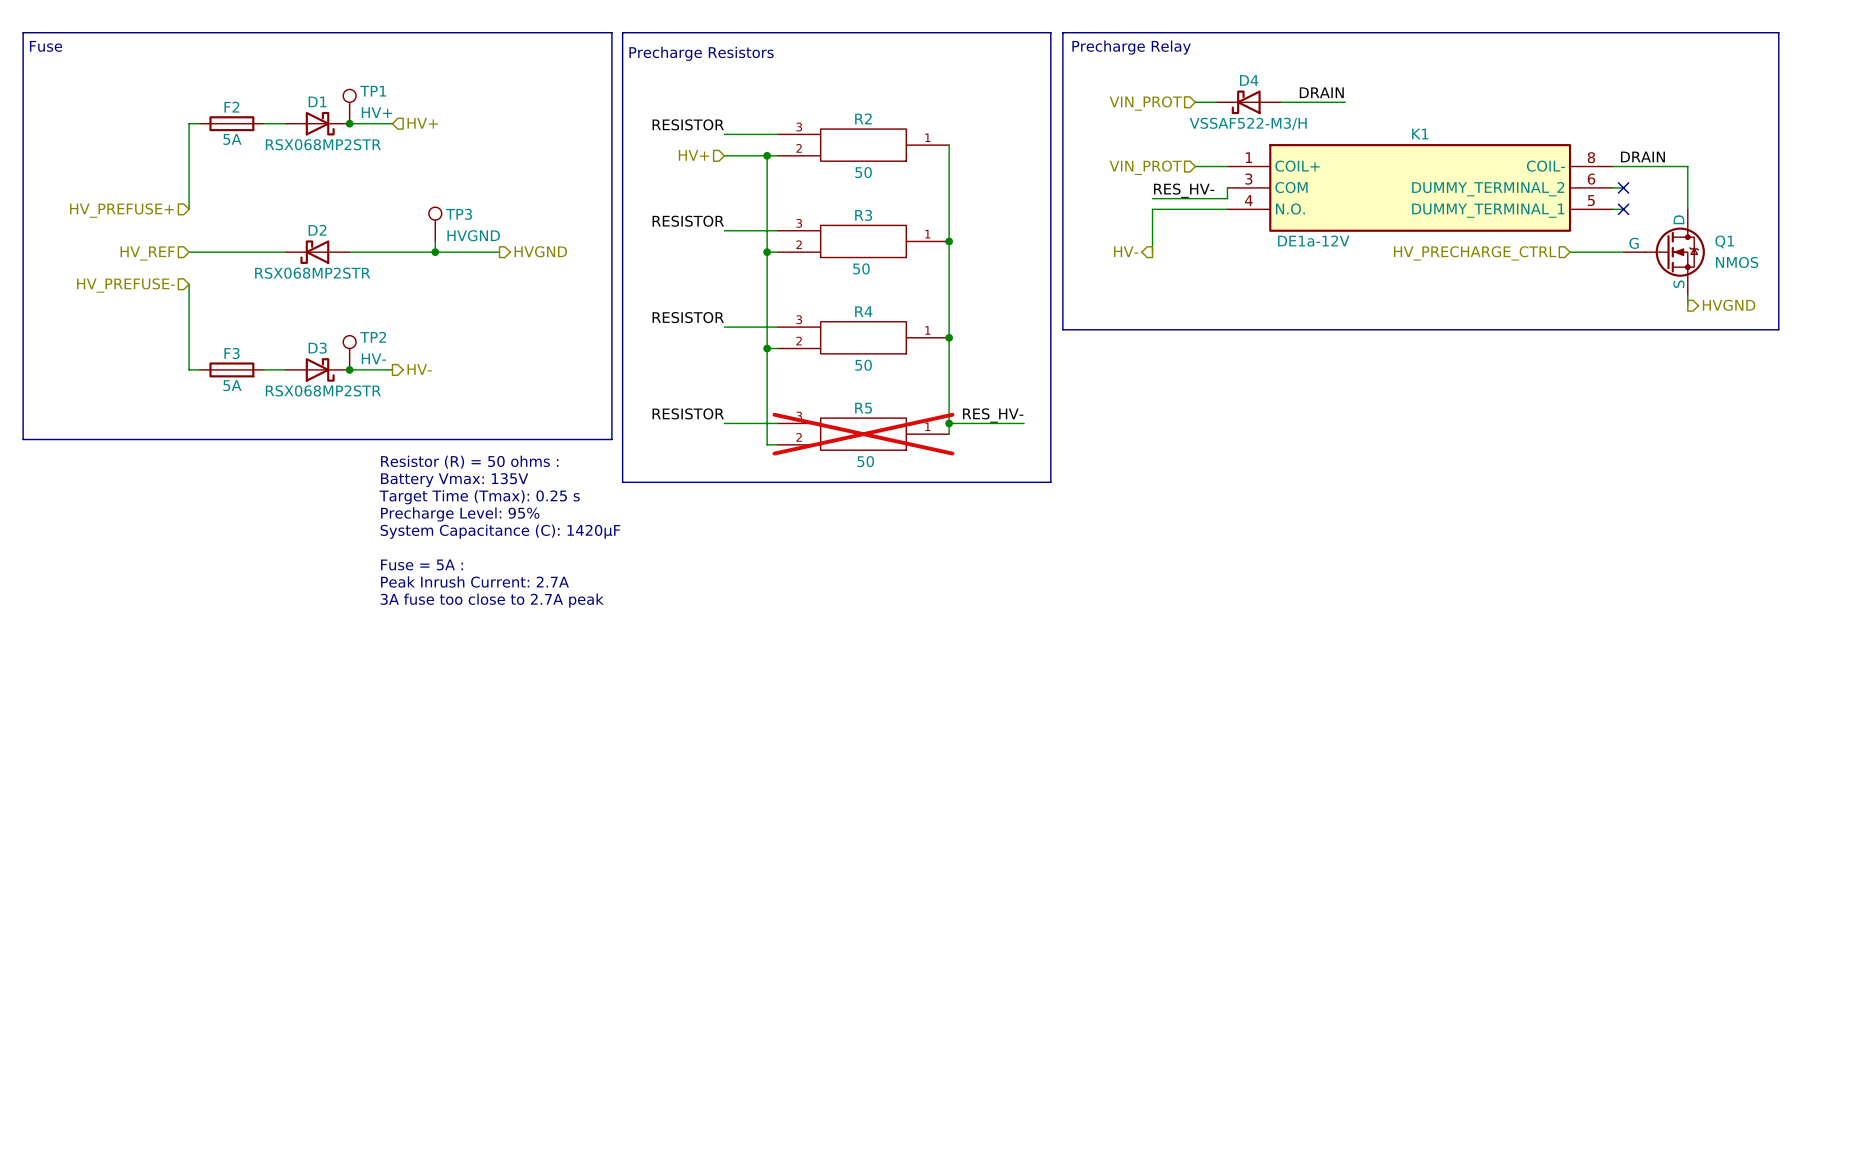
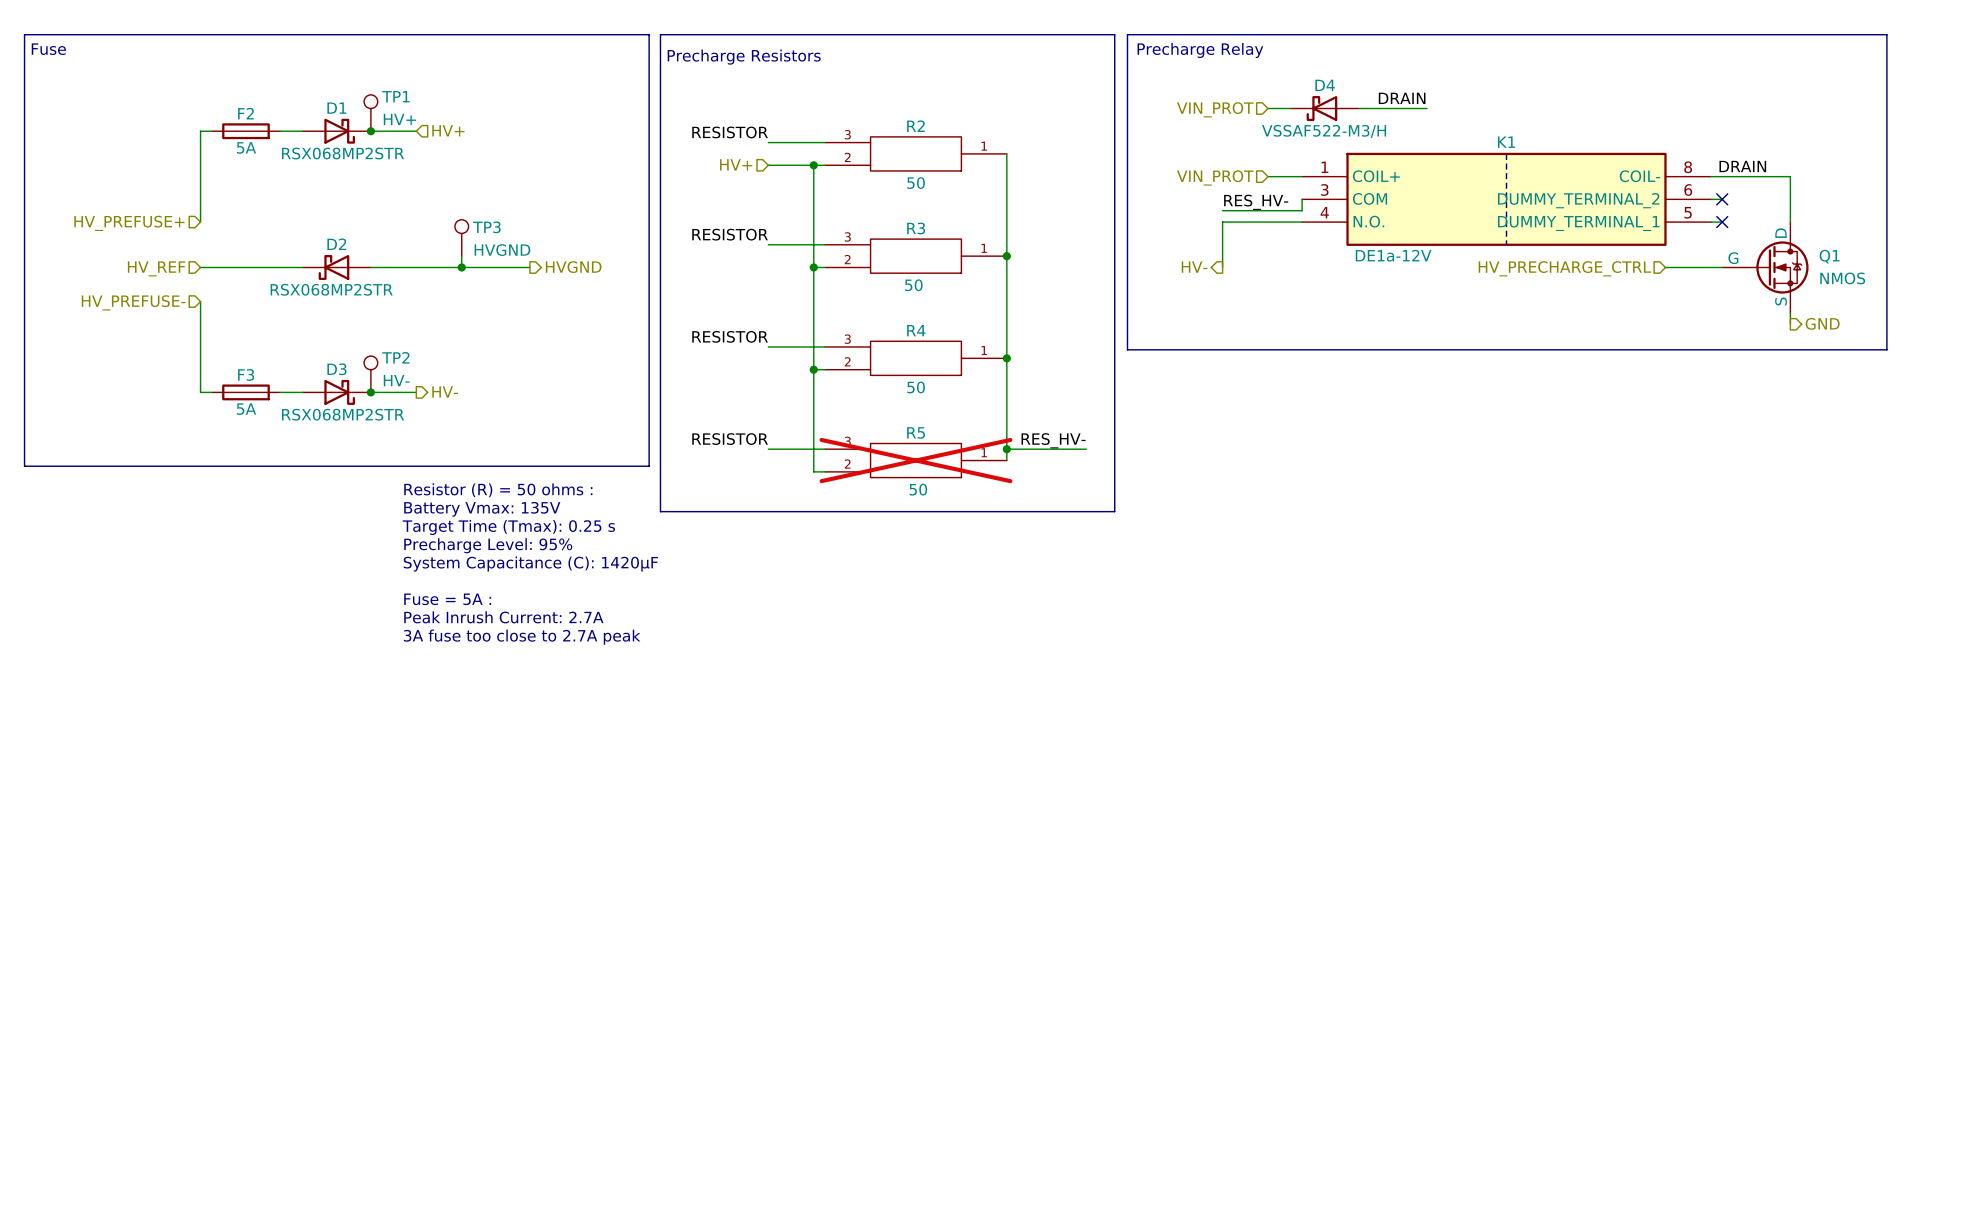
line: none -> (1506, 153) (1506, 244)
hierarchical label: HVGND (1729, 305) -> GND (1822, 323)

